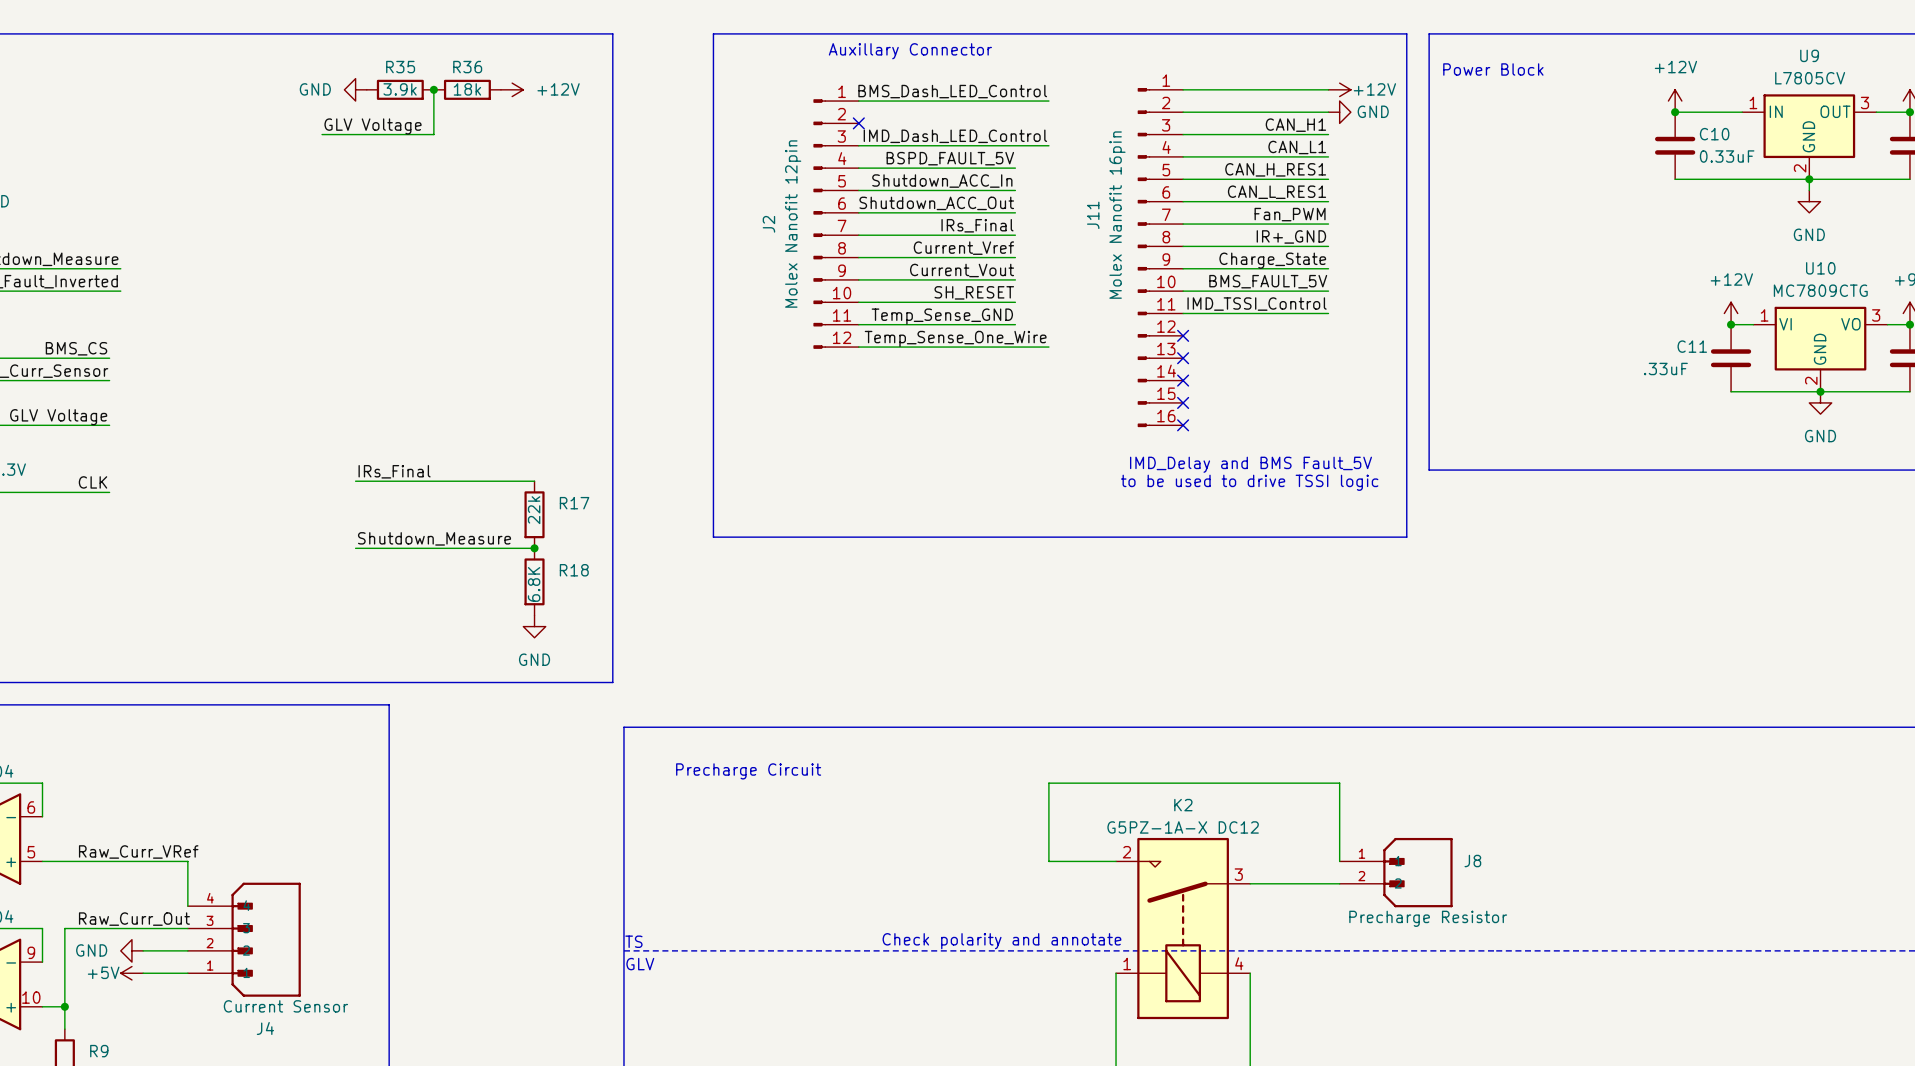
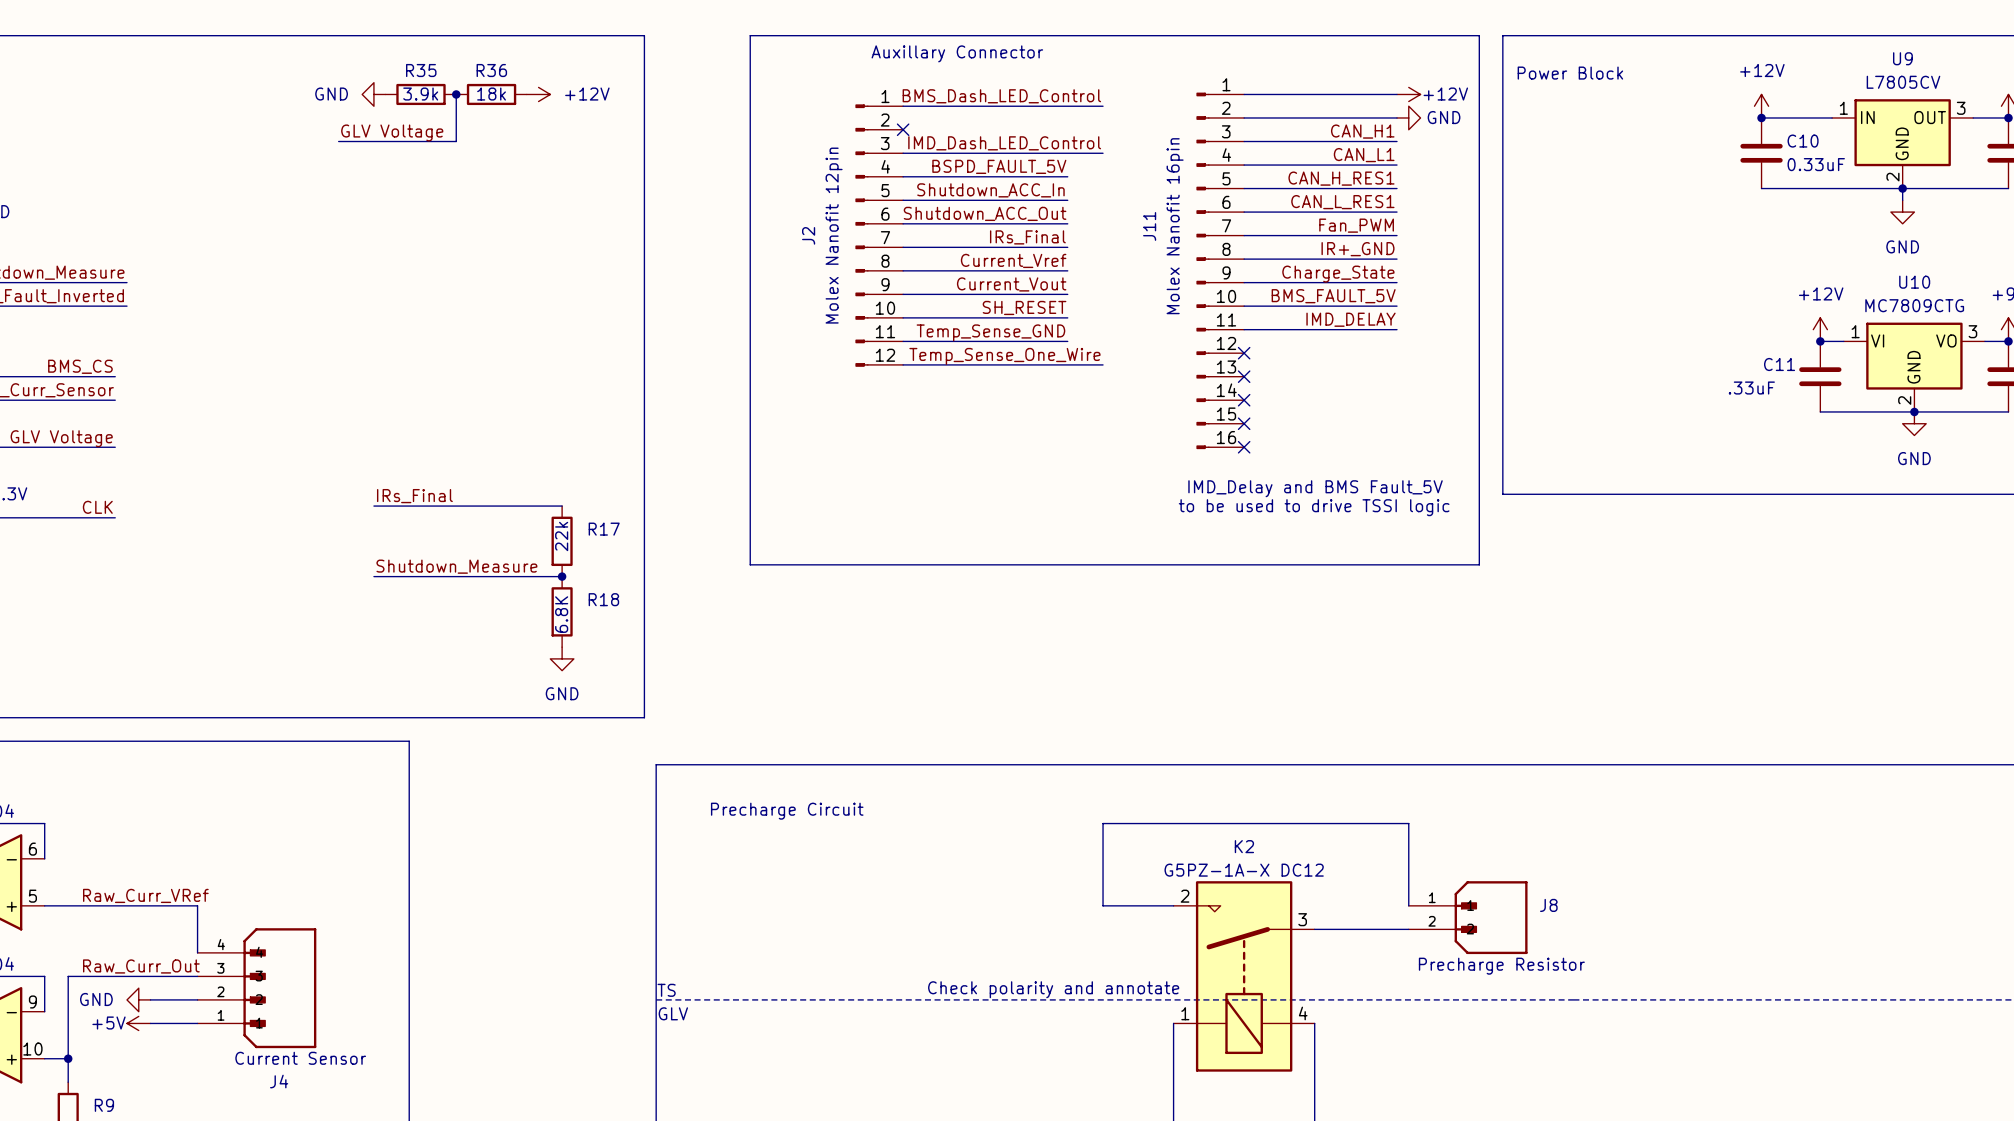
label: IMD_TSSI_Control (1257, 304) -> IMD_DELAY (1351, 319)

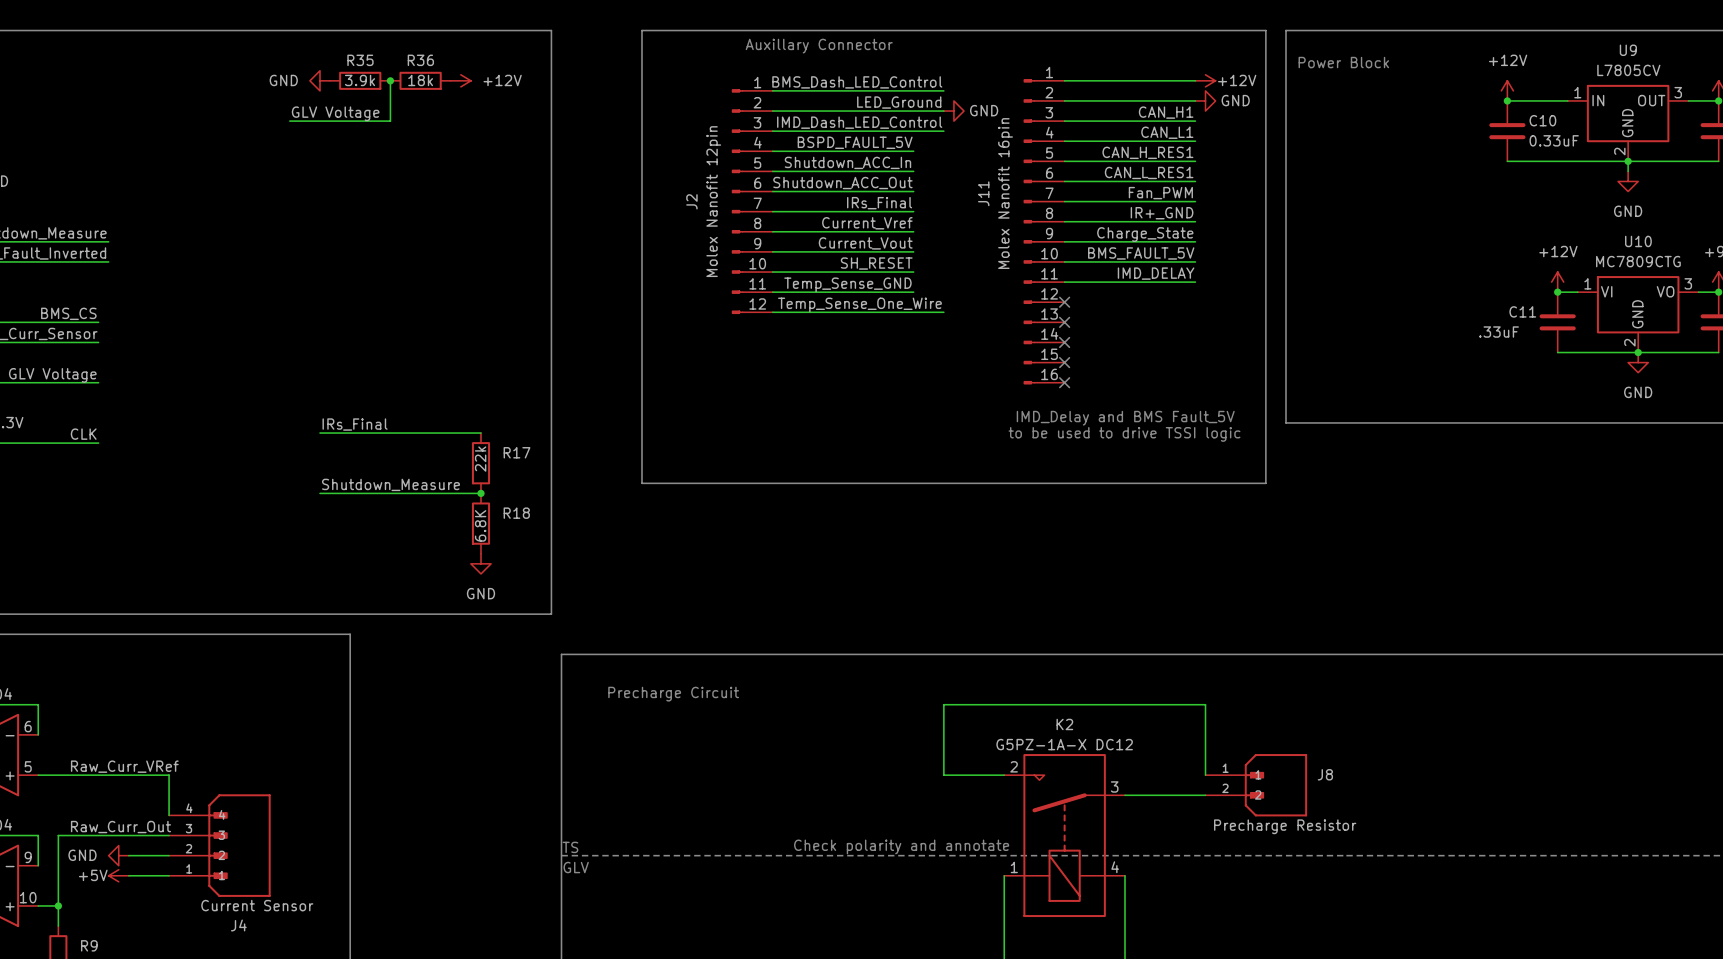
label: none -> LED_Ground (899, 102)
wire: none -> (772, 111) (943, 111)
no-connect mark: (903, 129) -> none
power symbol: none -> GND (953, 111)

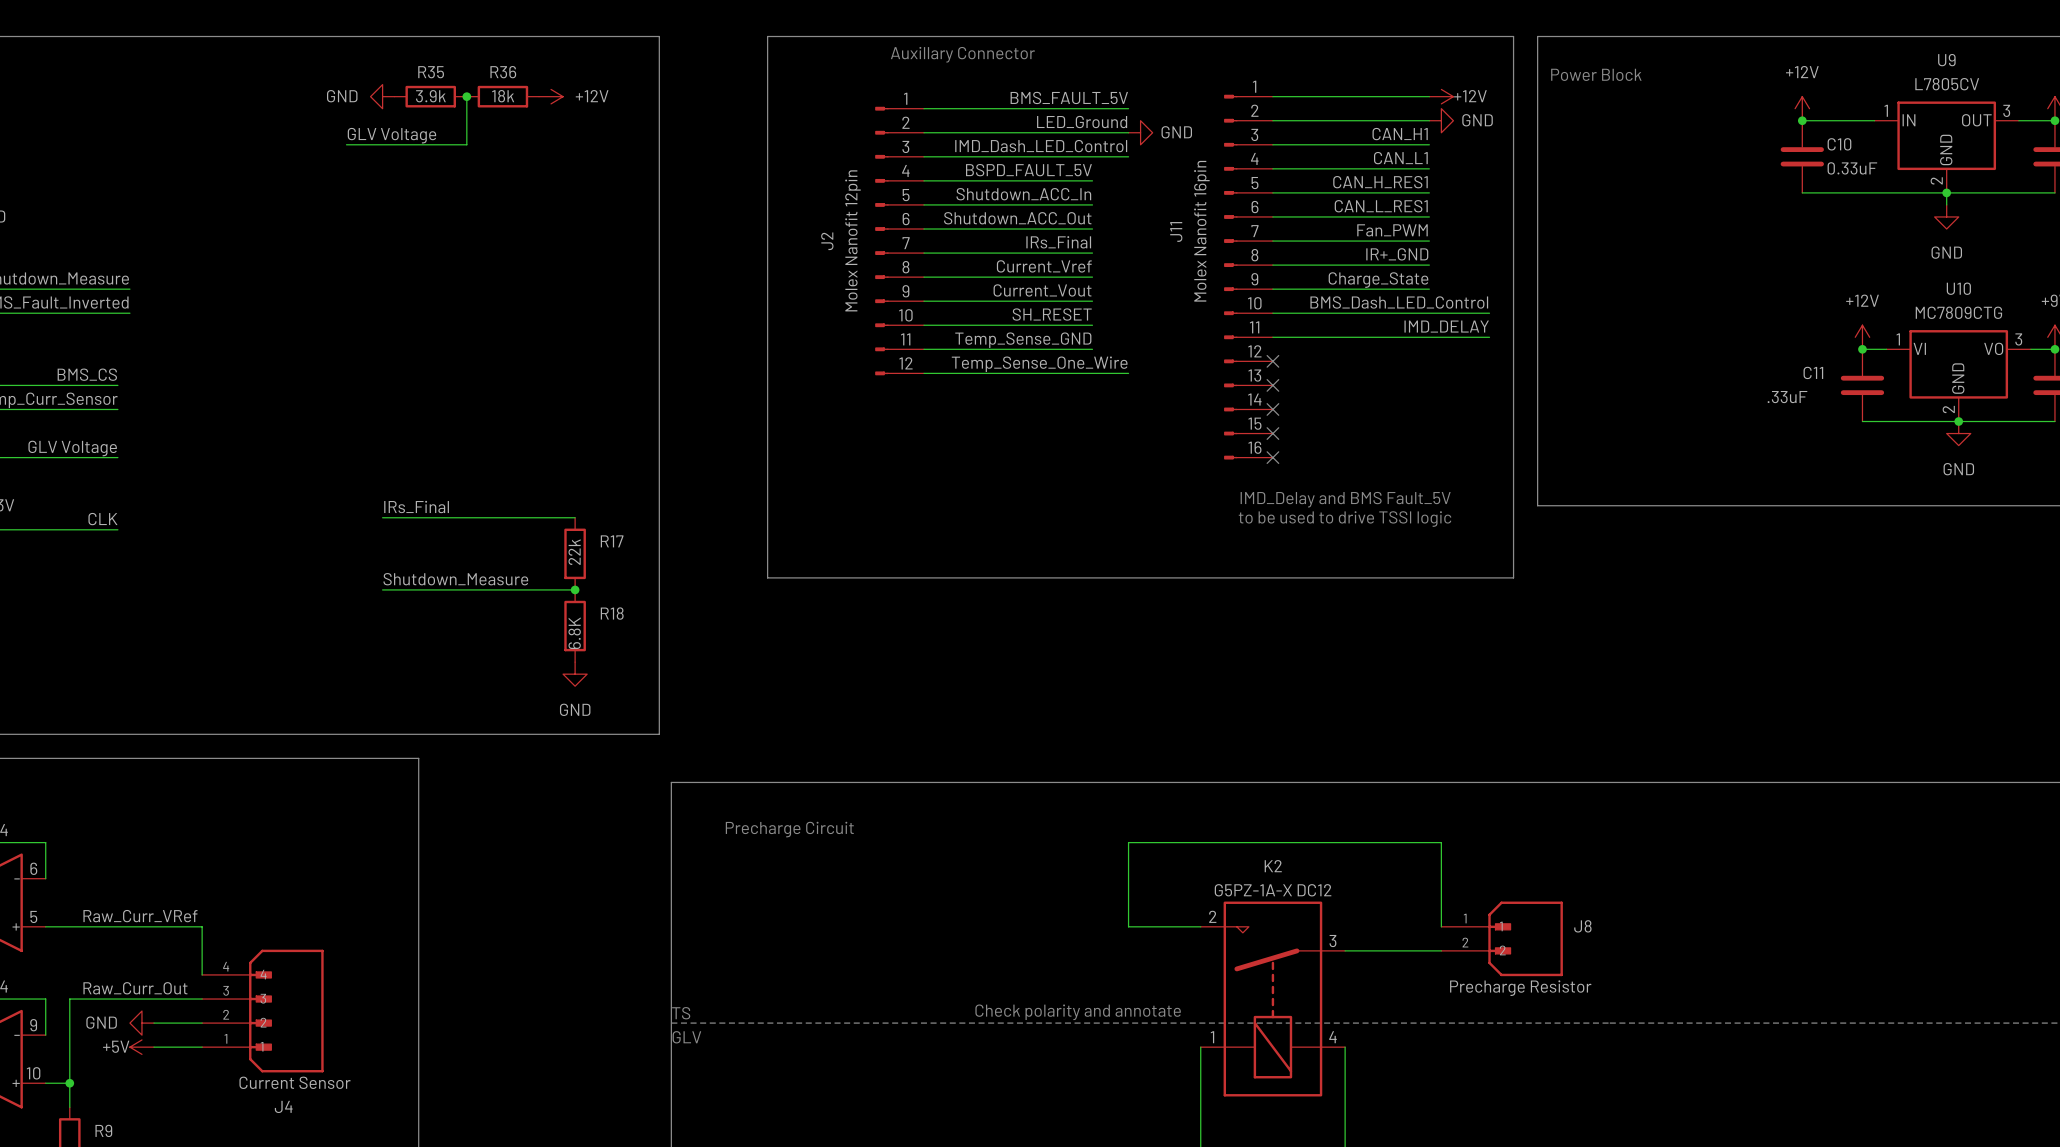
label: BMS_Dash_LED_Control (857, 82) -> BMS_FAULT_5V (1069, 97)
label: BMS_FAULT_5V (1141, 253) -> none
label: none -> BMS_Dash_LED_Control (1399, 302)
wire: none -> (1429, 313) (1489, 313)
label position: IMD_DELAY (1156, 273) -> IMD_DELAY (1446, 326)
wire: none -> (1429, 337) (1489, 337)

